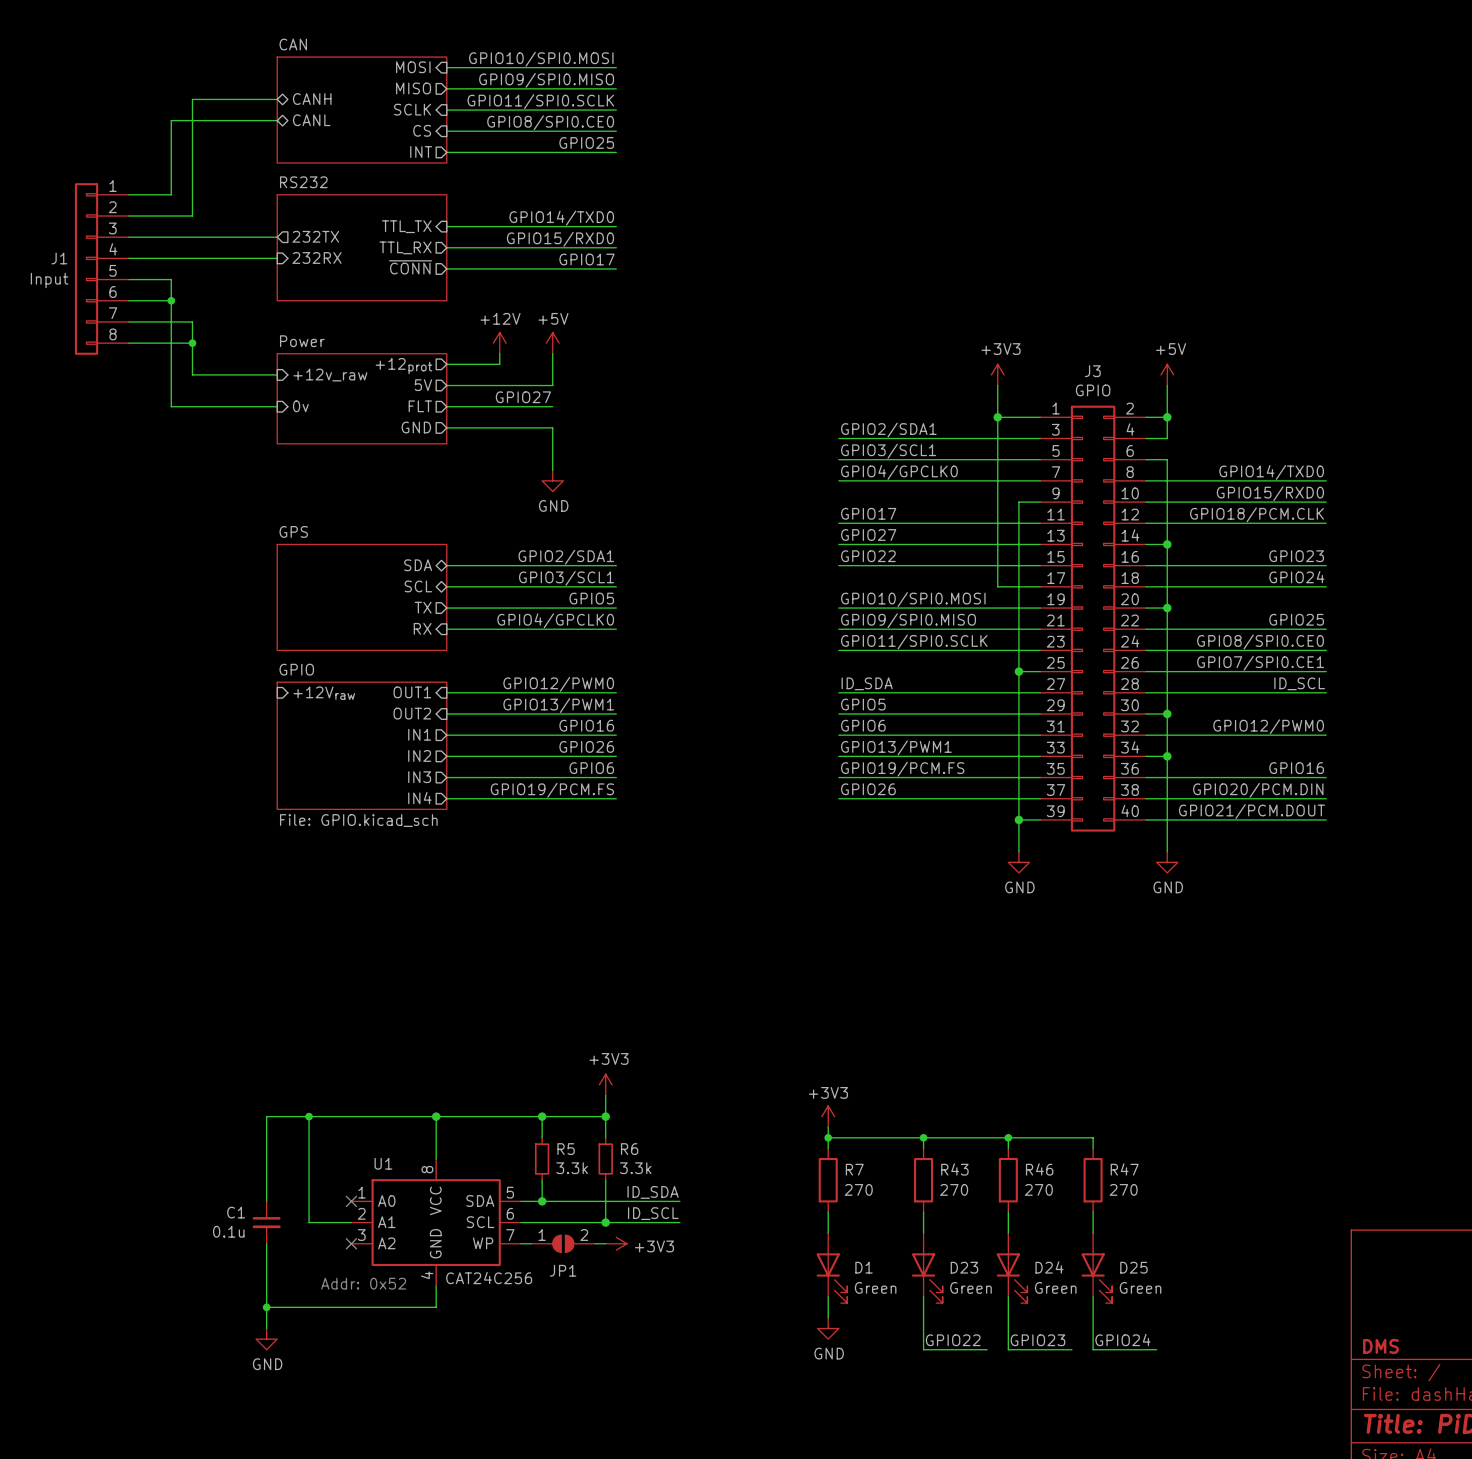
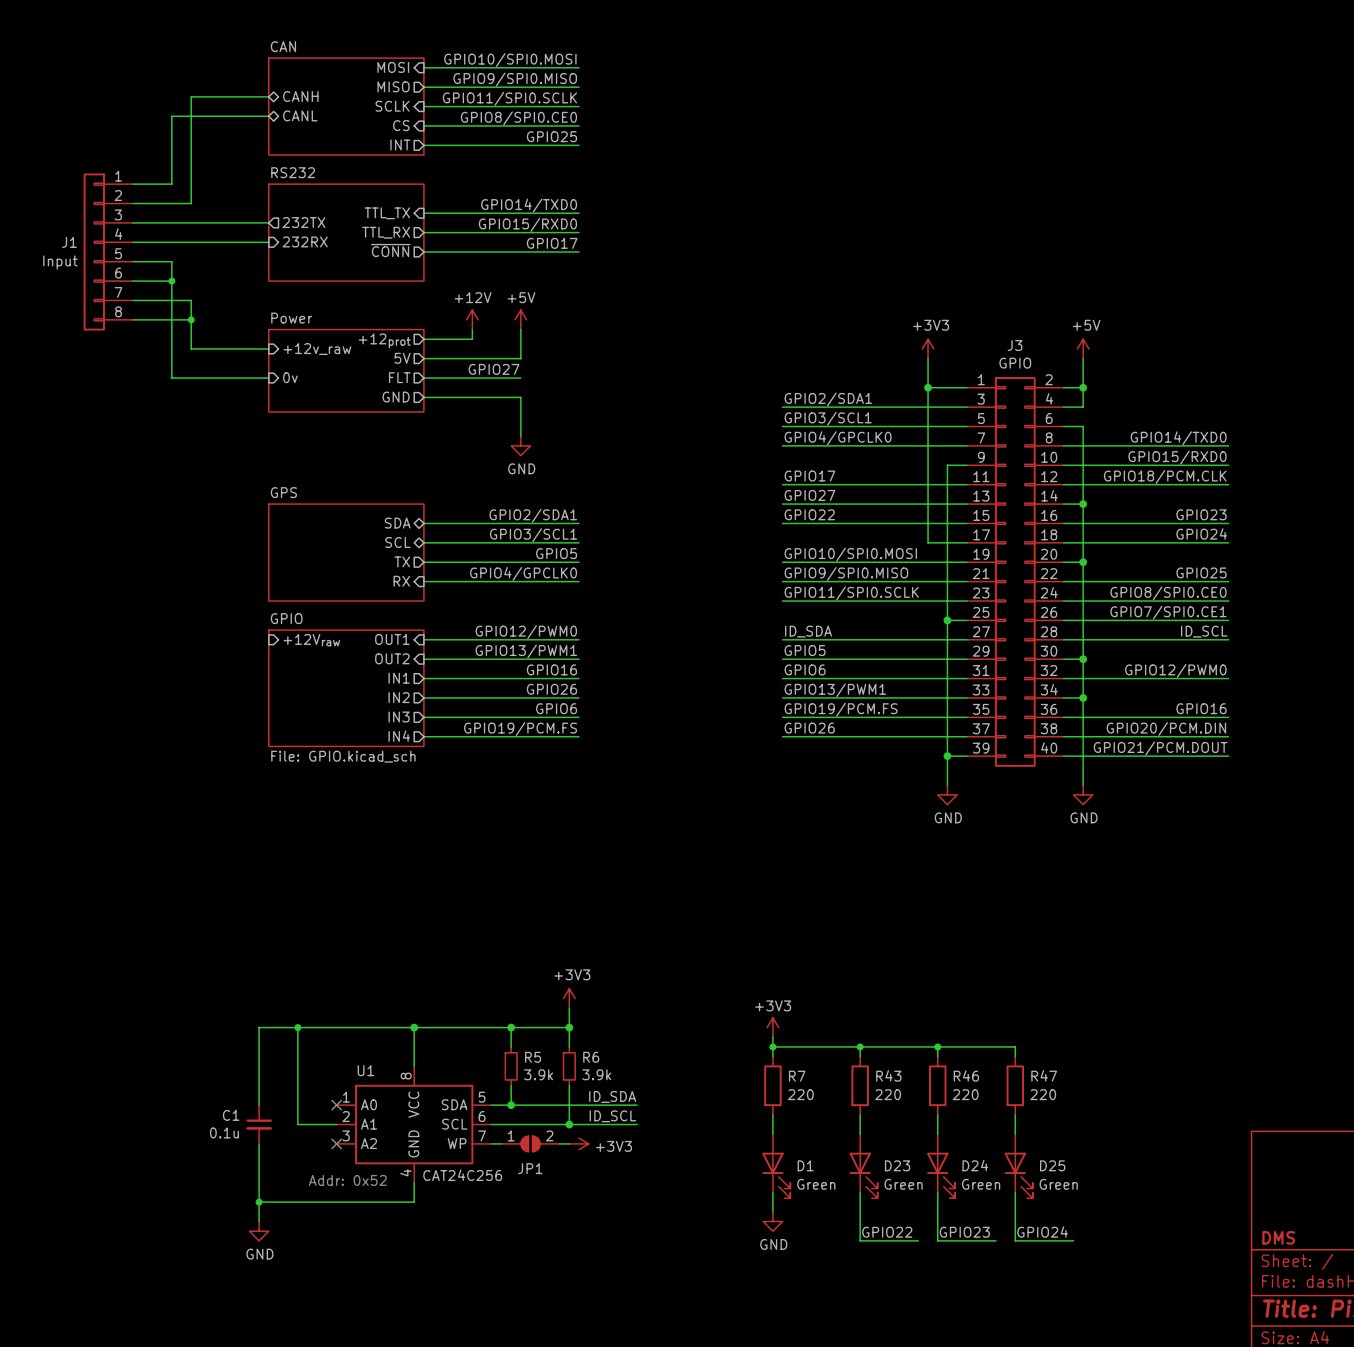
R5 value: 3.3k (572, 1168) -> 3.9k (538, 1074)
R6 value: 3.3k (635, 1168) -> 3.9k (596, 1074)
R7 value: 270 (858, 1189) -> 220 (800, 1094)
R43 value: 270 (954, 1189) -> 220 (888, 1094)
R46 value: 270 (1038, 1189) -> 220 (965, 1094)
R47 value: 270 (1123, 1189) -> 220 (1043, 1094)

